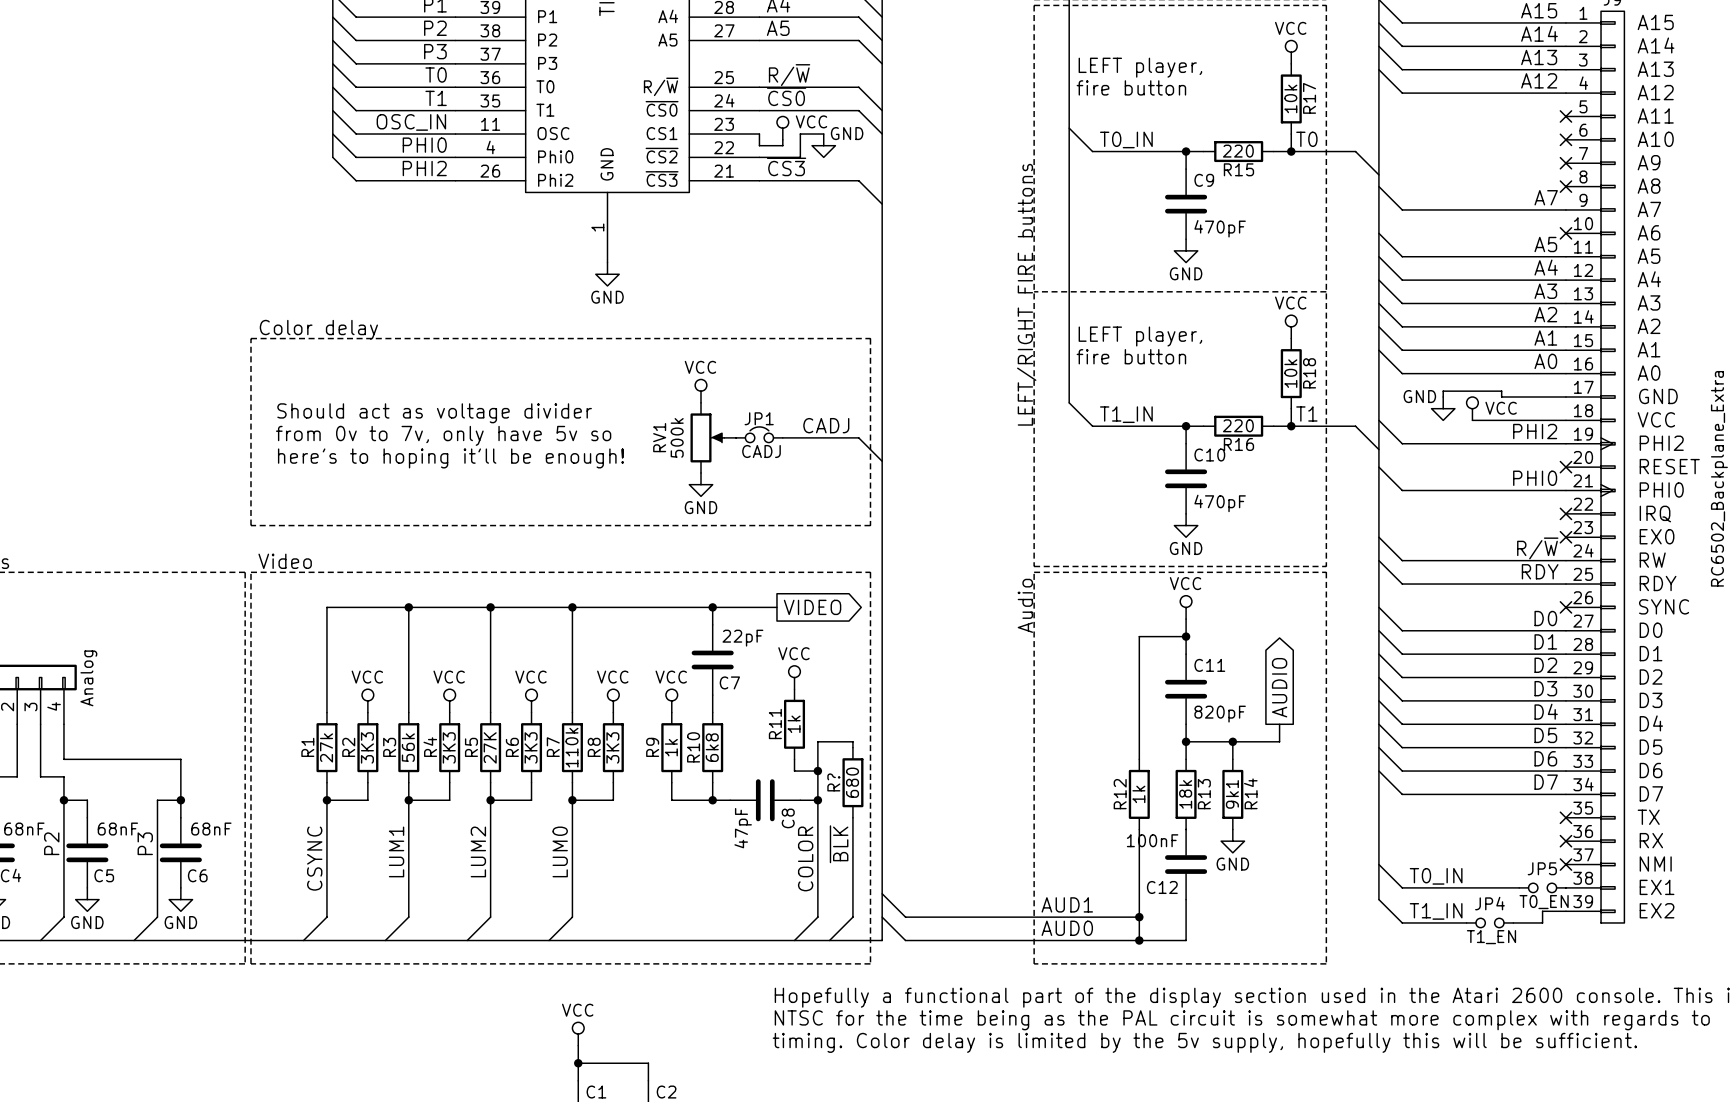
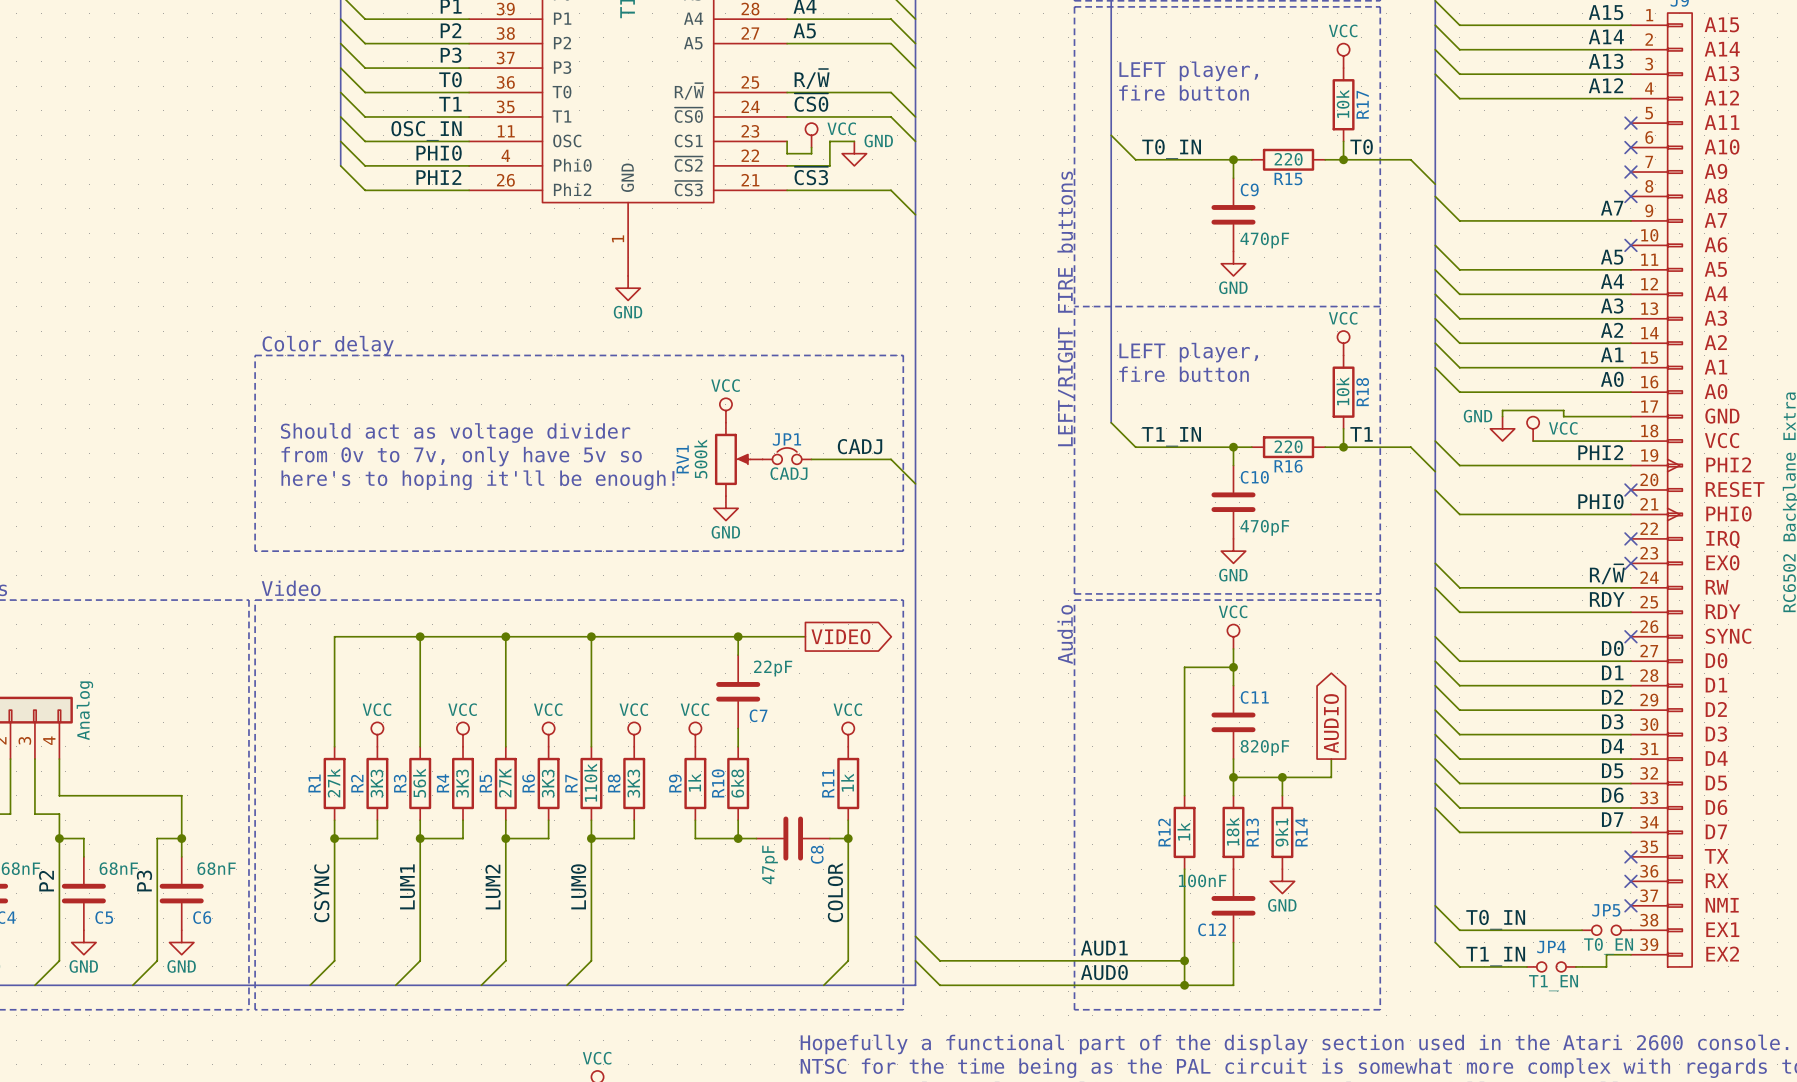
power symbol position: VCC (794, 677) -> VCC (848, 734)
R11 position: (794, 724) -> (848, 783)
wire: (852, 747) (852, 741) (817, 741) (817, 782) -> none
wire: (794, 759) (794, 771) (817, 771) -> none
junction: (817, 771) -> none
R?: 680 (852, 782) -> none
wire: (852, 817) (852, 917) (829, 940) -> none
label: ~{BLK} (839, 844) -> none

